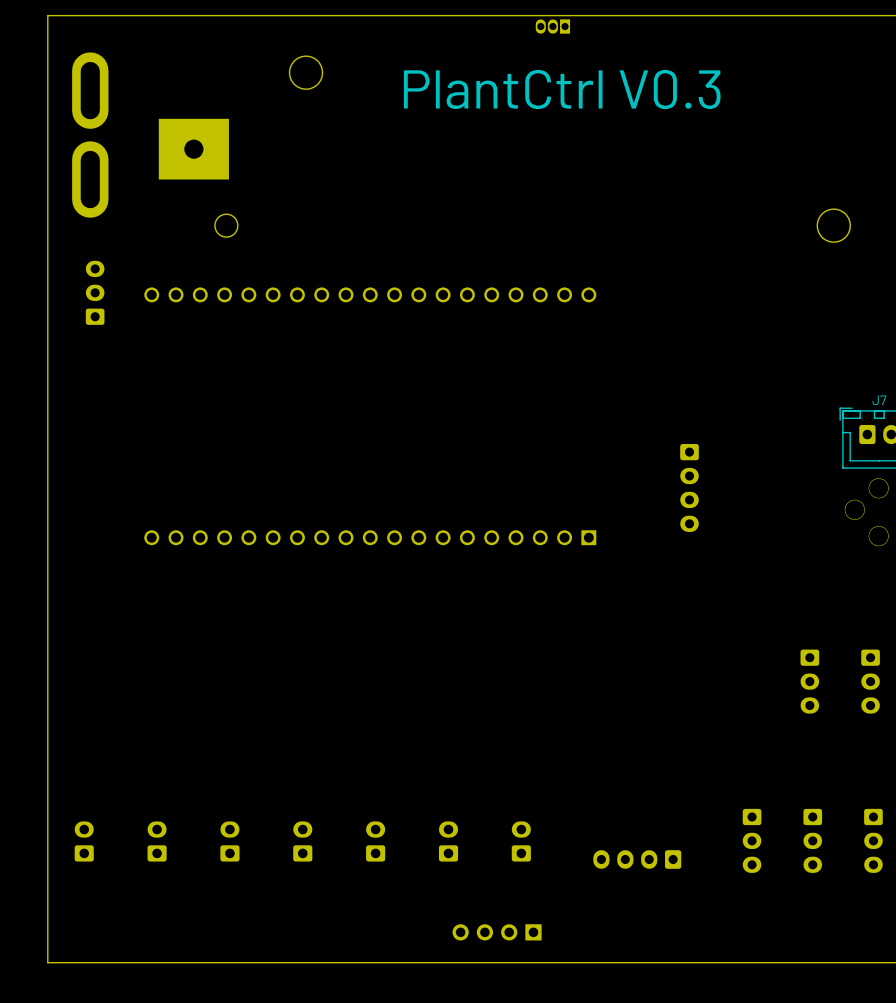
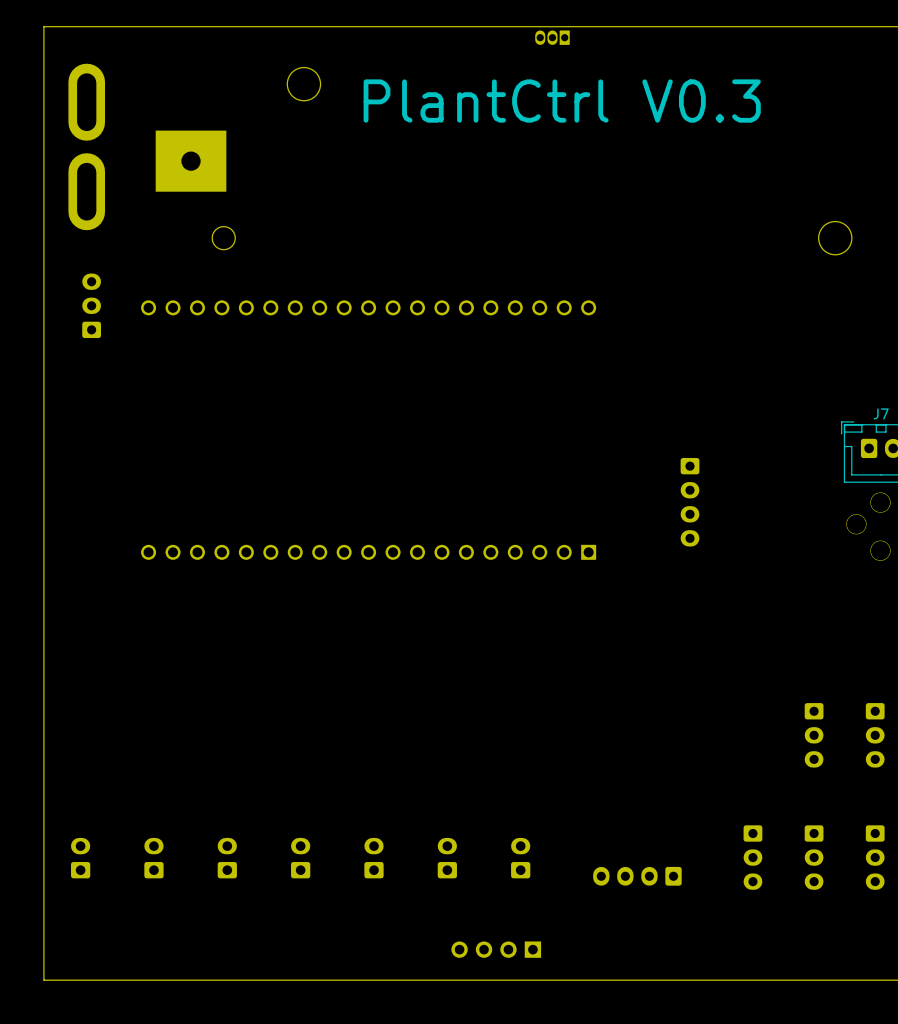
part: (809, 681) -> none
part: (870, 681) -> none
part: none -> (814, 735)
part: none -> (875, 735)

